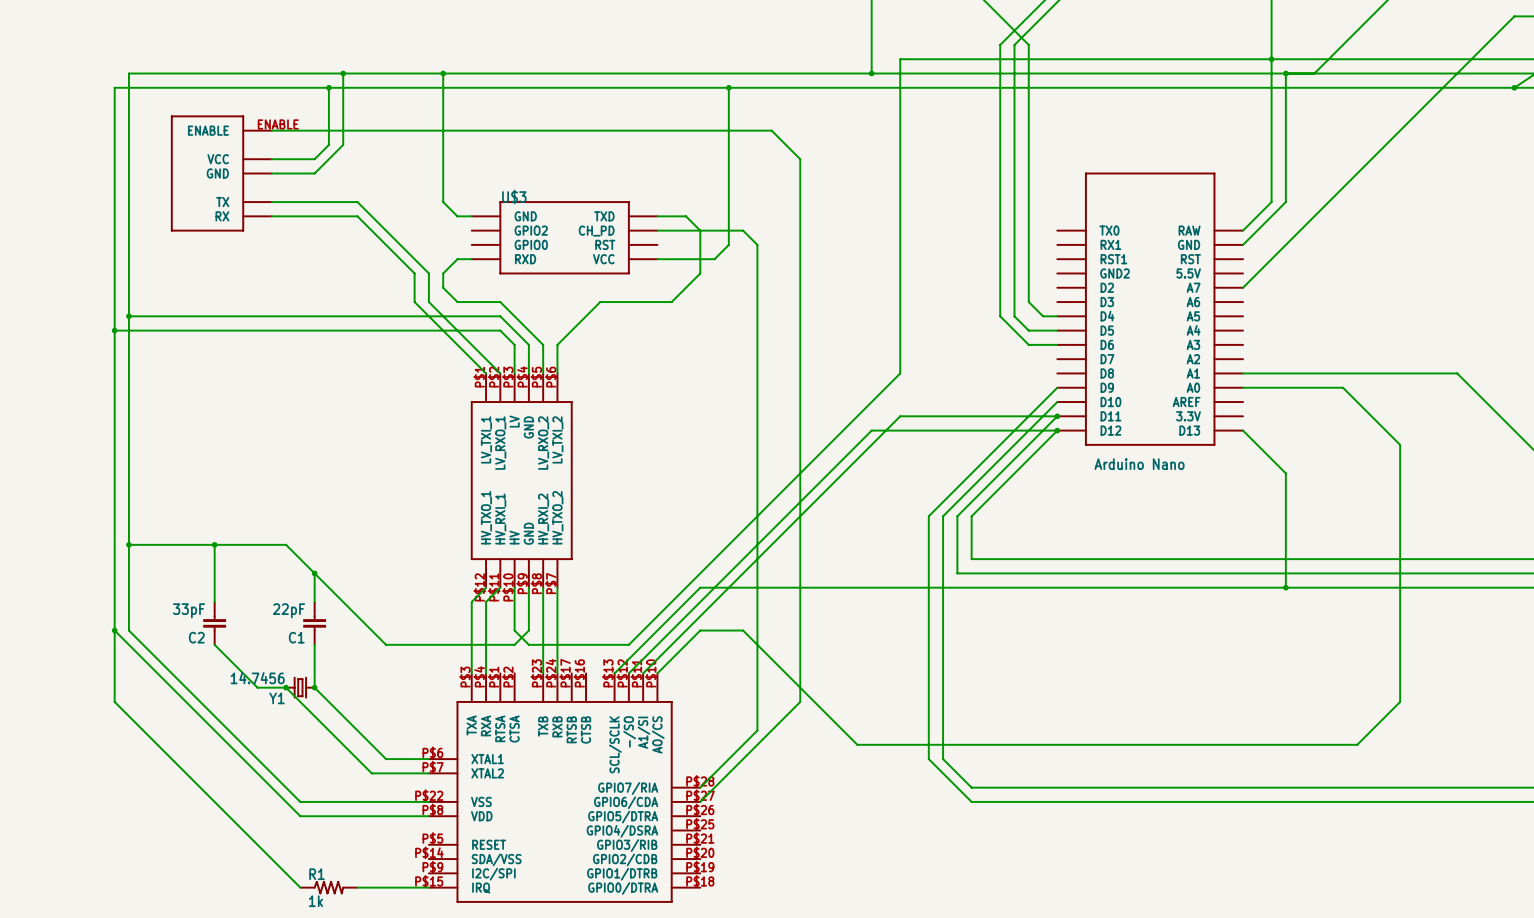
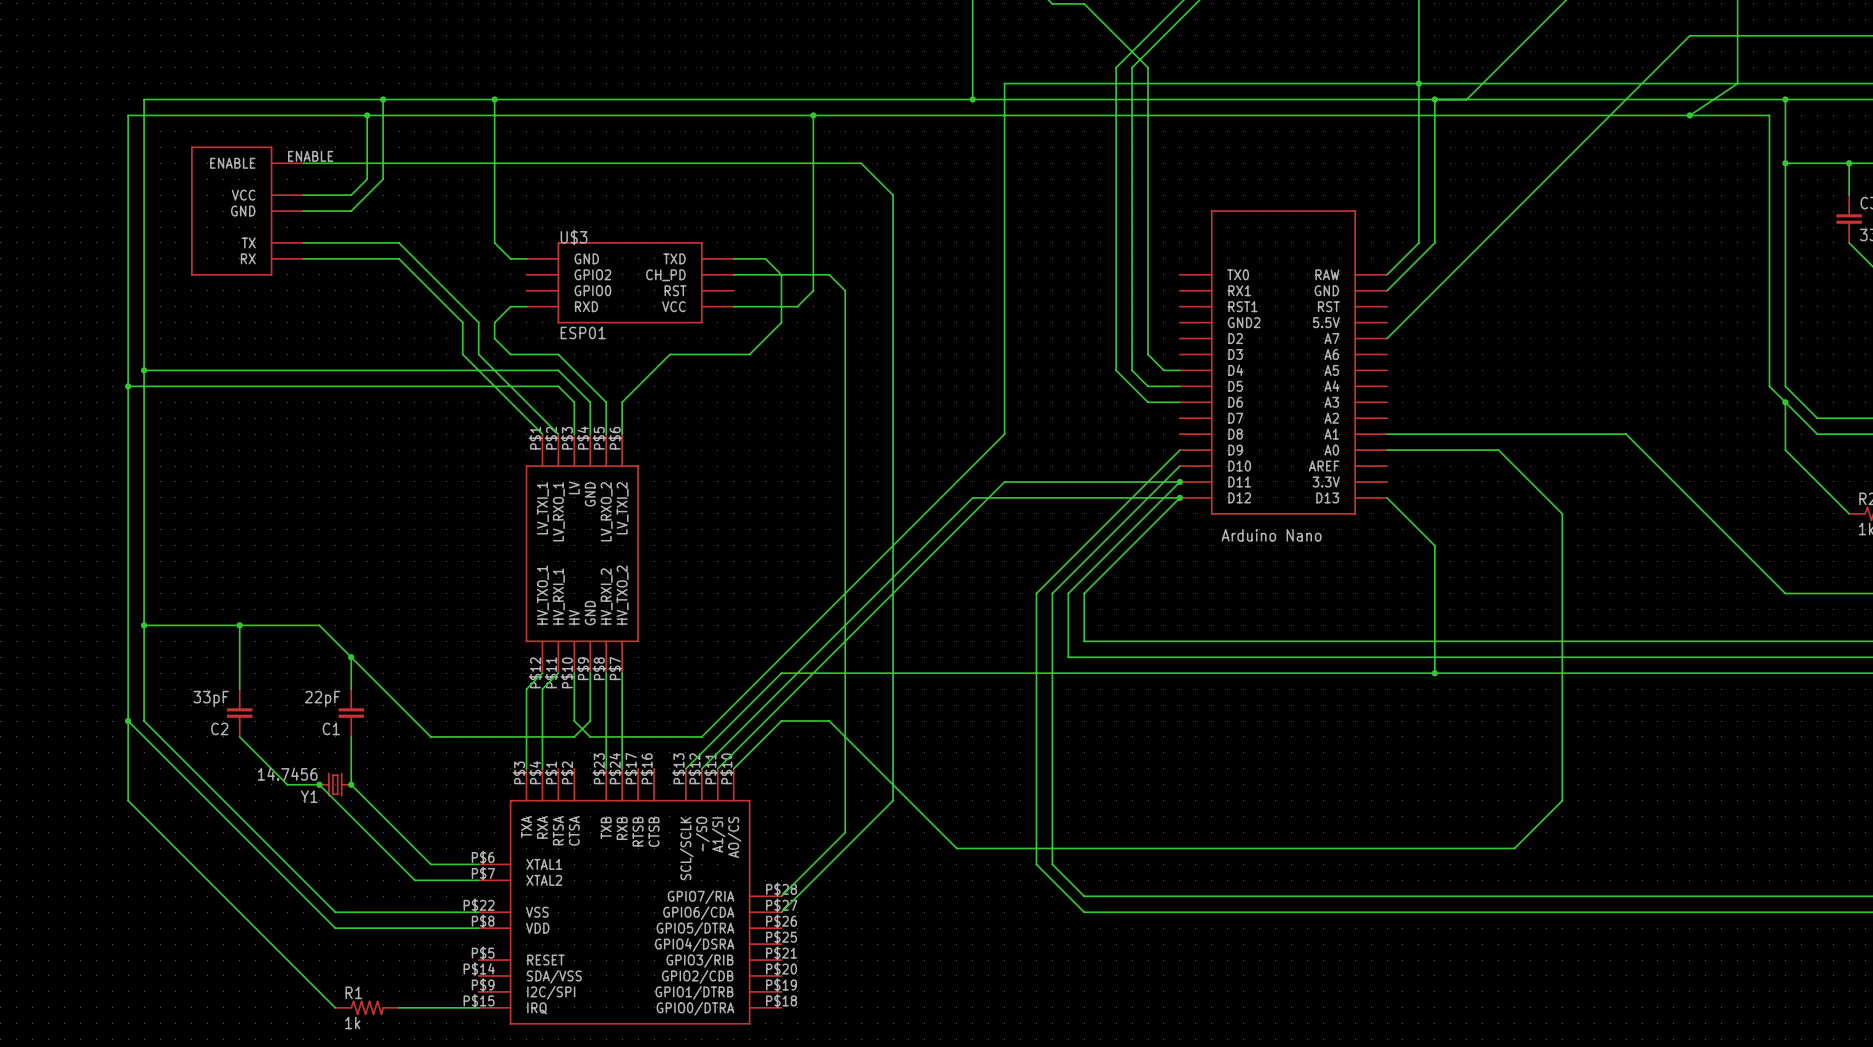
U$3 value: none -> ESP01 (583, 332)

